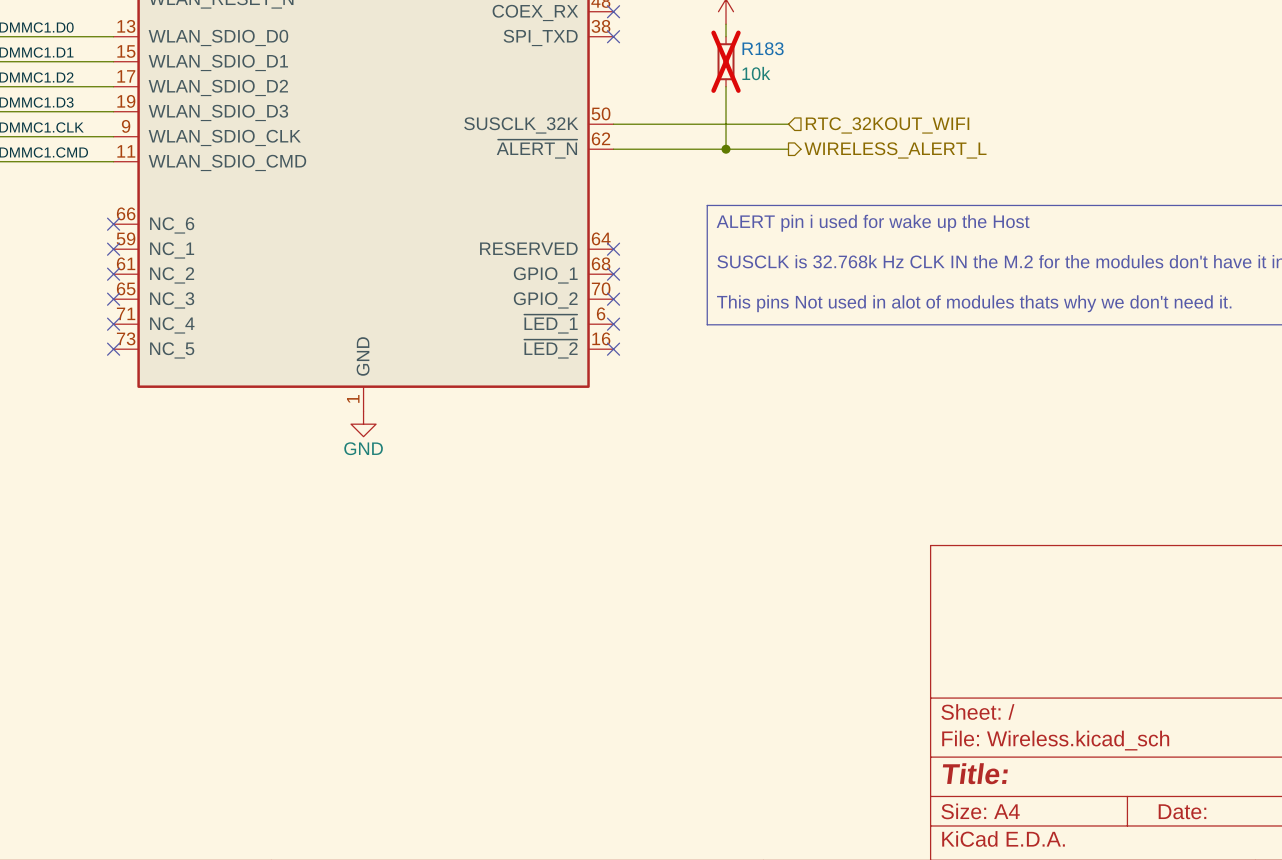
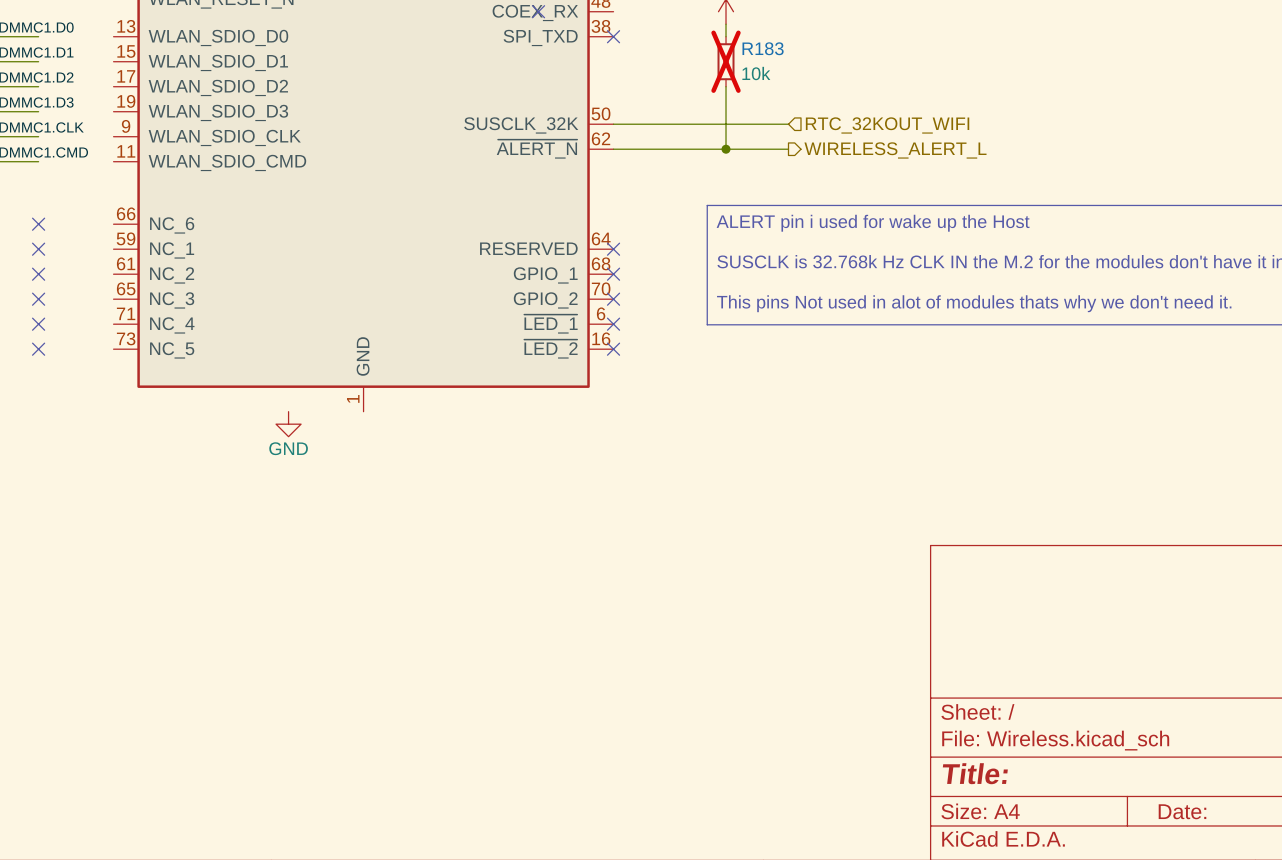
no-connect mark: none -> (538, 11)
no-connect mark: (613, 11) -> none
wire: (38, 36) (113, 36) -> none
wire: (38, 61) (113, 61) -> none
wire: (38, 86) (113, 86) -> none
wire: (38, 111) (113, 111) -> none
wire: (38, 136) (113, 136) -> none
wire: (38, 161) (113, 161) -> none
no-connect mark: none -> (38, 224)
no-connect mark: (113, 224) -> none
no-connect mark: none -> (38, 249)
no-connect mark: (113, 249) -> none
no-connect mark: none -> (38, 274)
no-connect mark: (113, 274) -> none
no-connect mark: none -> (38, 299)
no-connect mark: (113, 299) -> none
no-connect mark: none -> (38, 324)
no-connect mark: (113, 324) -> none
no-connect mark: none -> (38, 349)
no-connect mark: (113, 349) -> none
power symbol position: GND (363, 424) -> GND (288, 424)

